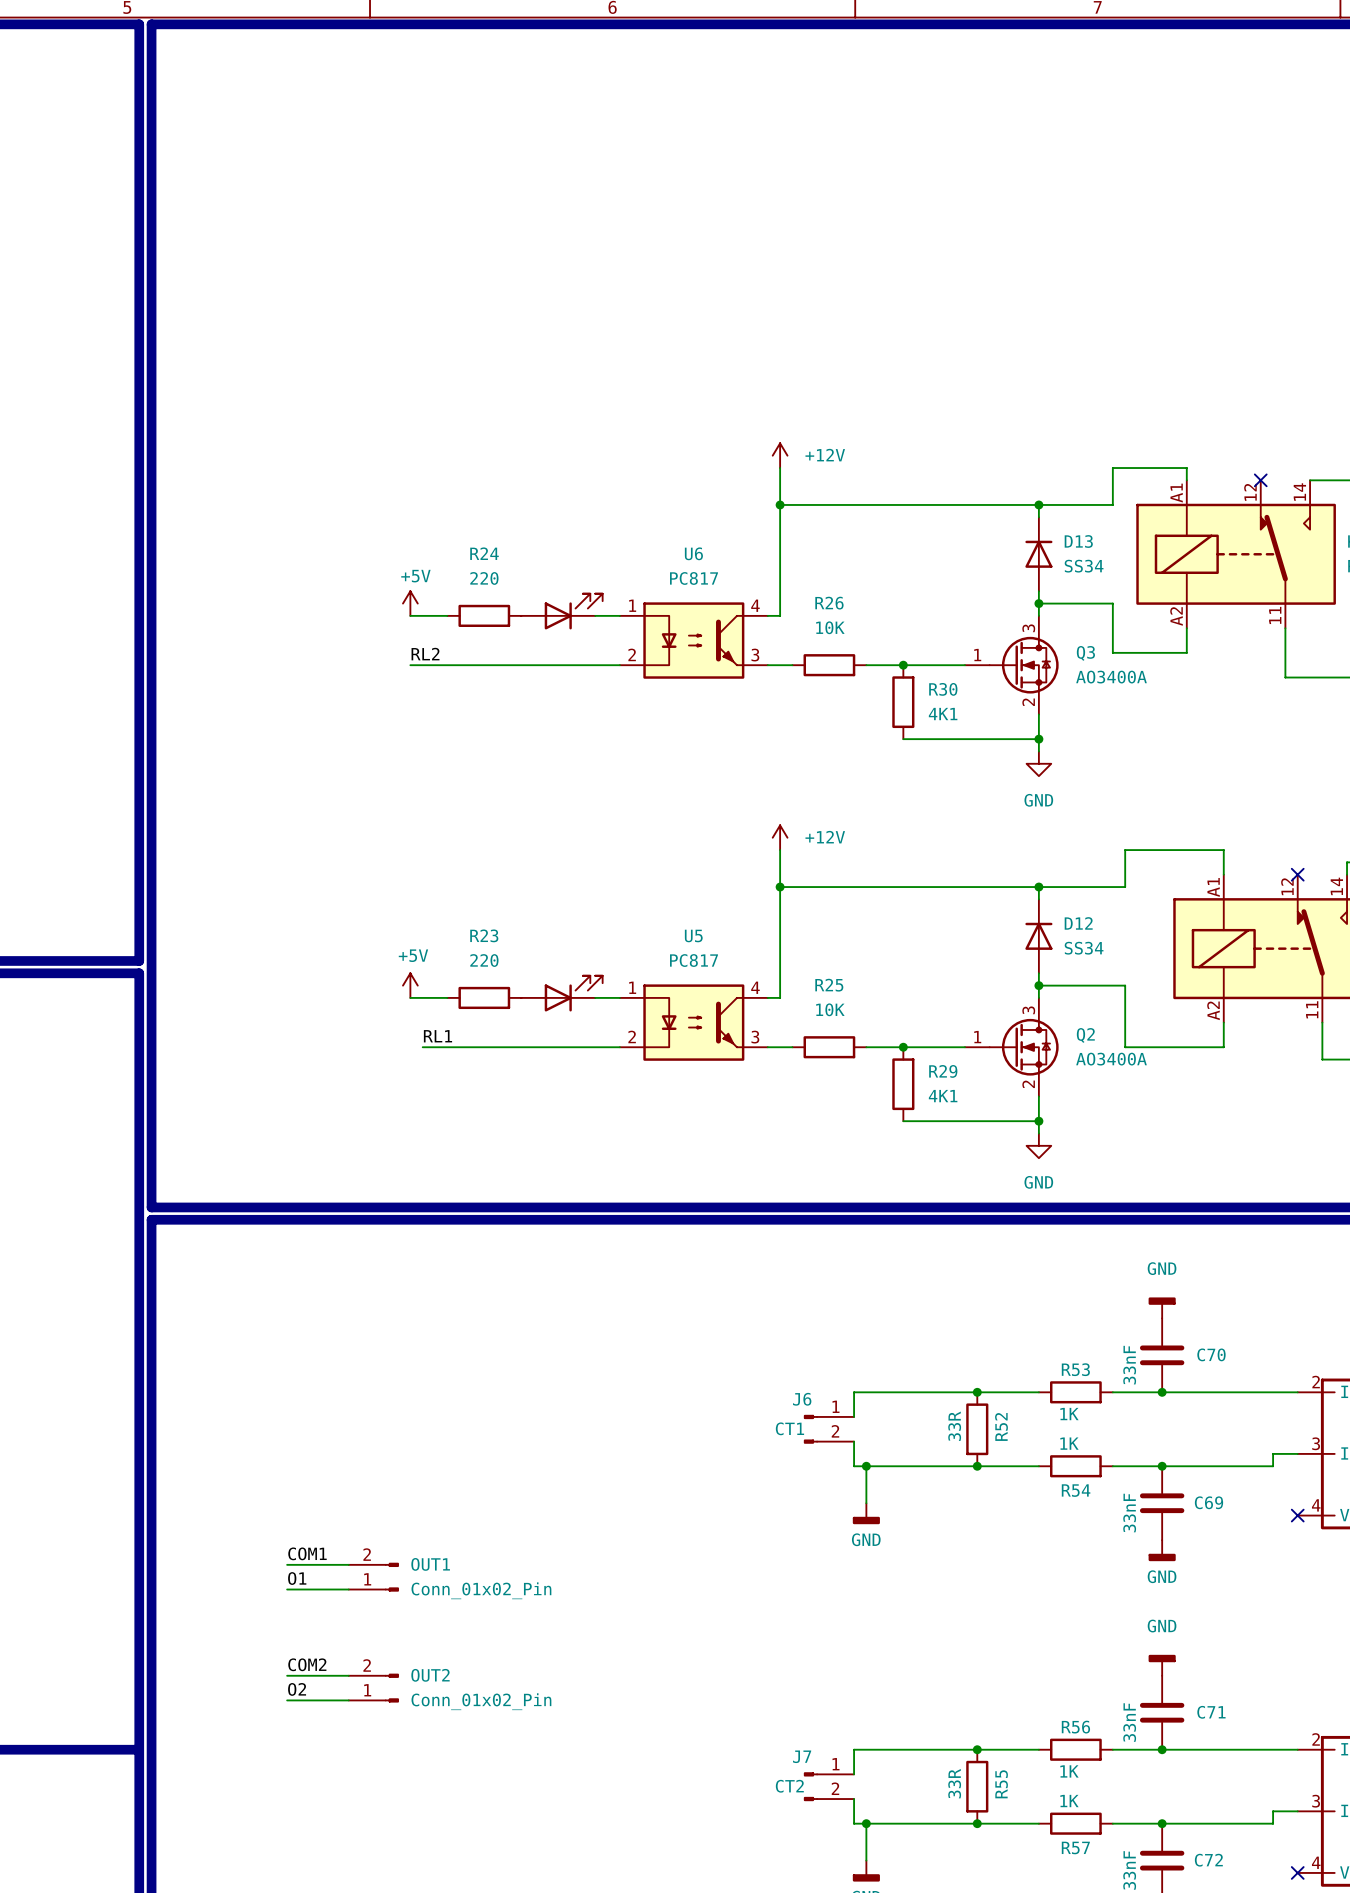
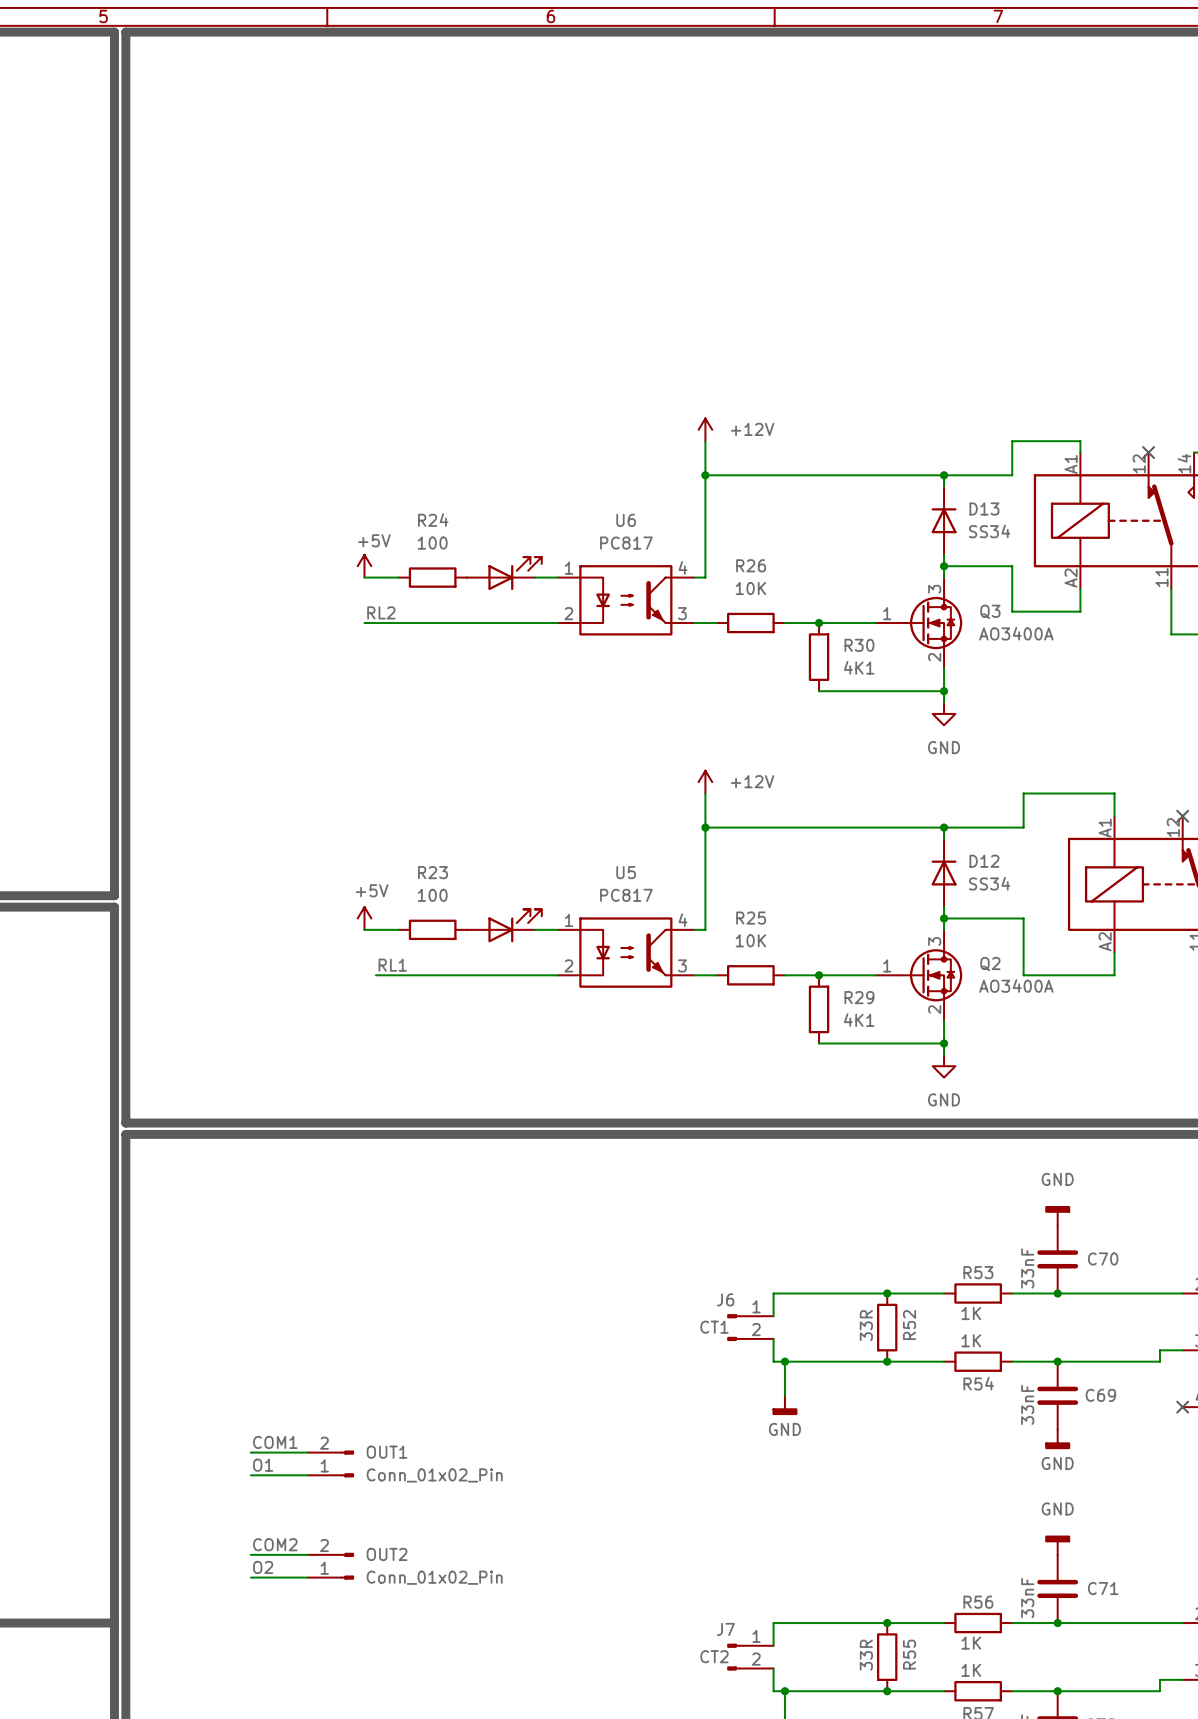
R24 value: 220 (484, 578) -> 100 (432, 543)
R23 value: 220 (484, 960) -> 100 (432, 895)

